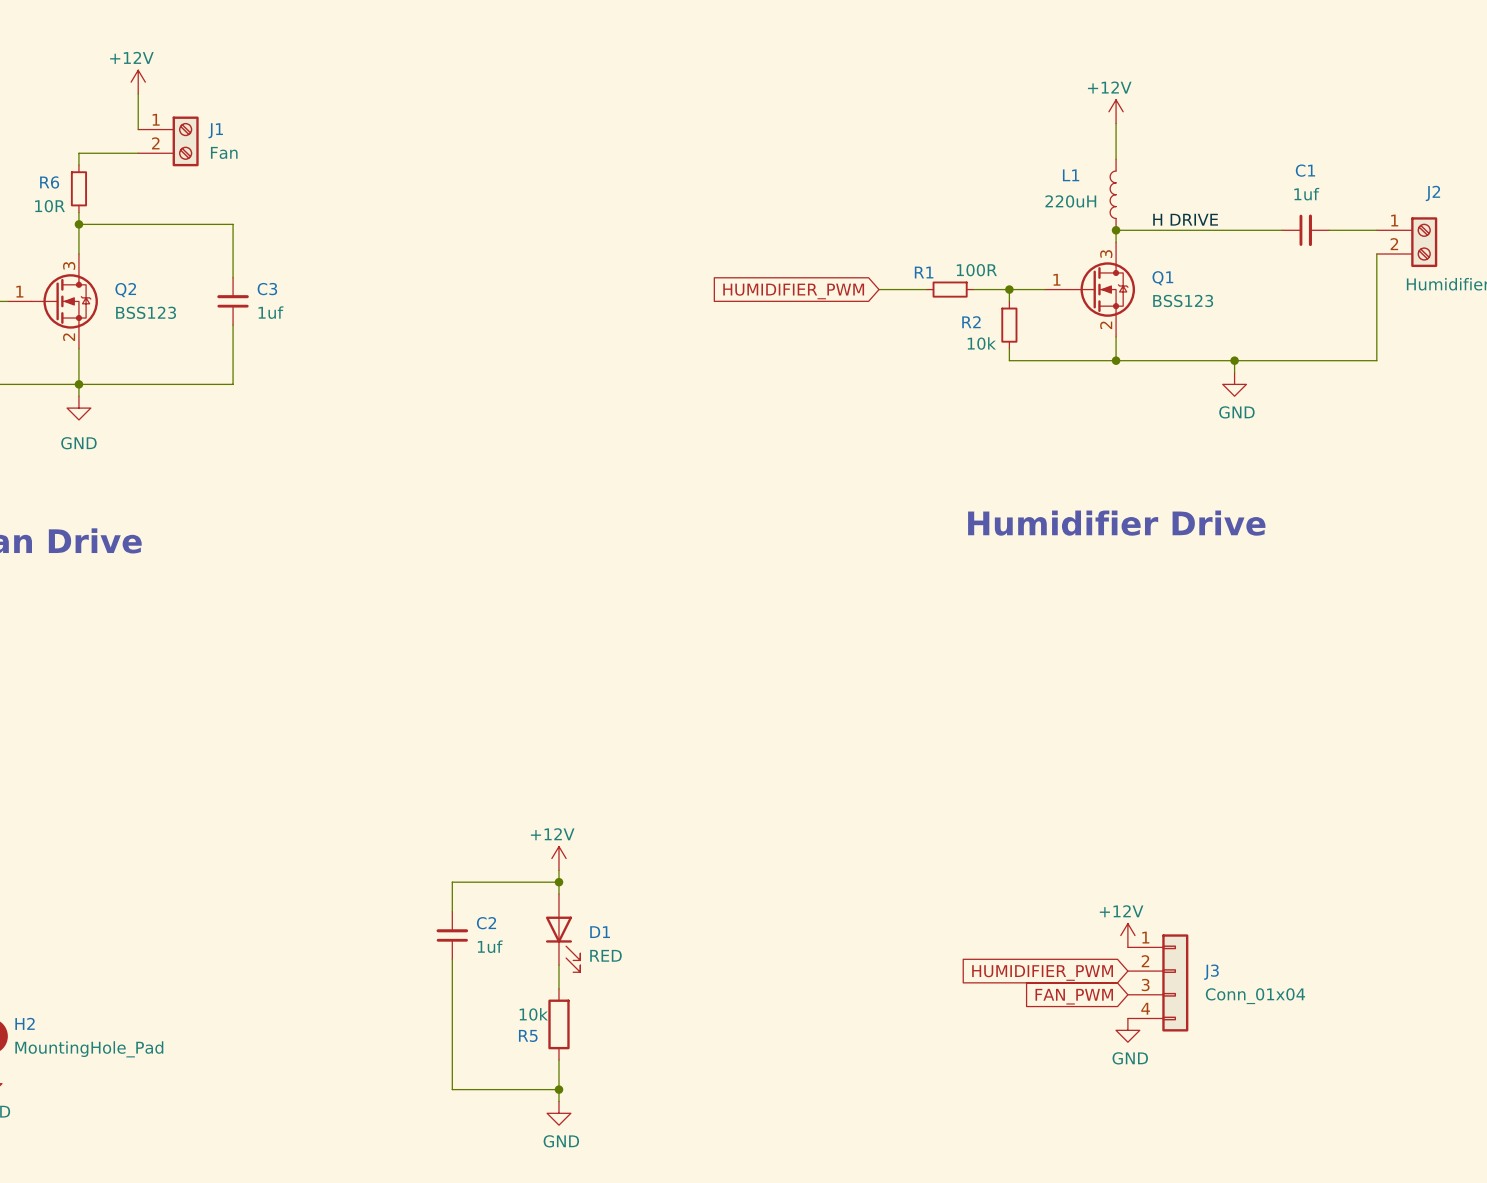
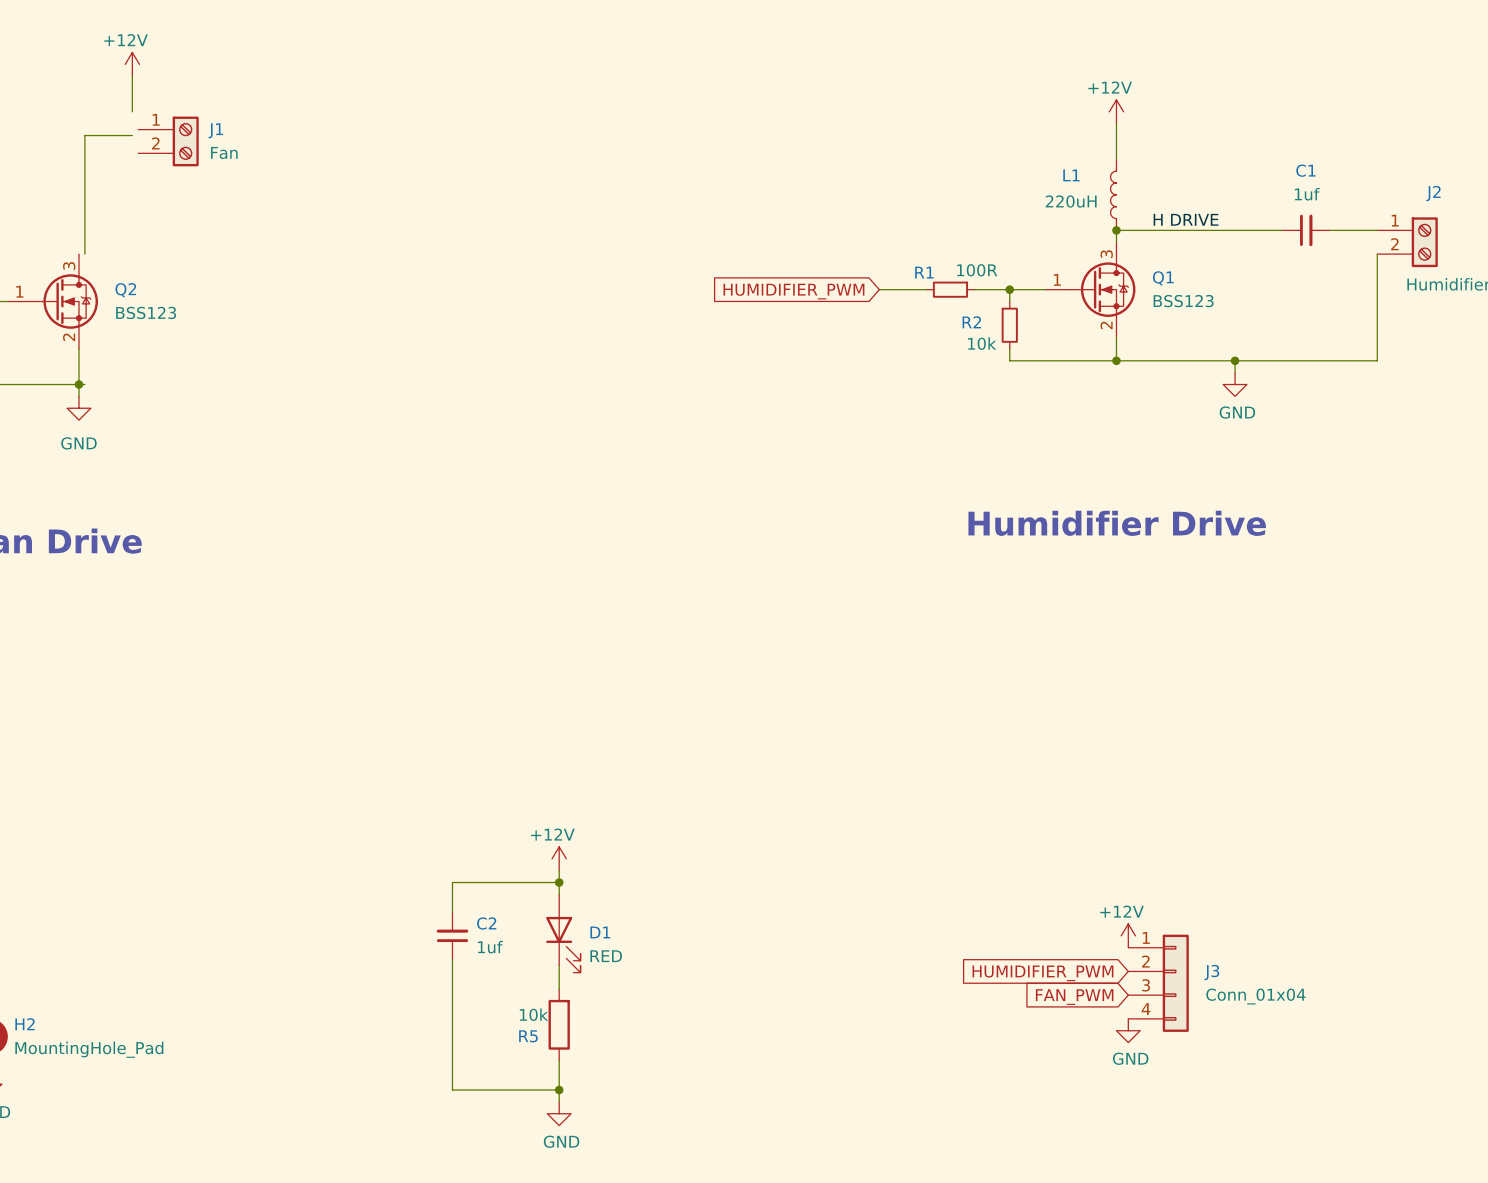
power symbol position: +12V (138, 82) -> +12V (132, 64)
wire: (138, 94) (138, 129) -> (132, 76) (132, 111)
wire: none -> (132, 135) (84, 135) (84, 254)
wire: (138, 153) (78, 153) (78, 165) -> none
R6: 10R (78, 188) -> none
wire: (78, 212) (78, 254) -> none
wire: (78, 224) (233, 224) (233, 277) -> none
junction: (78, 224) -> none
C3: 1uf (233, 301) -> none
wire: (233, 325) (233, 384) (84, 384) -> none

